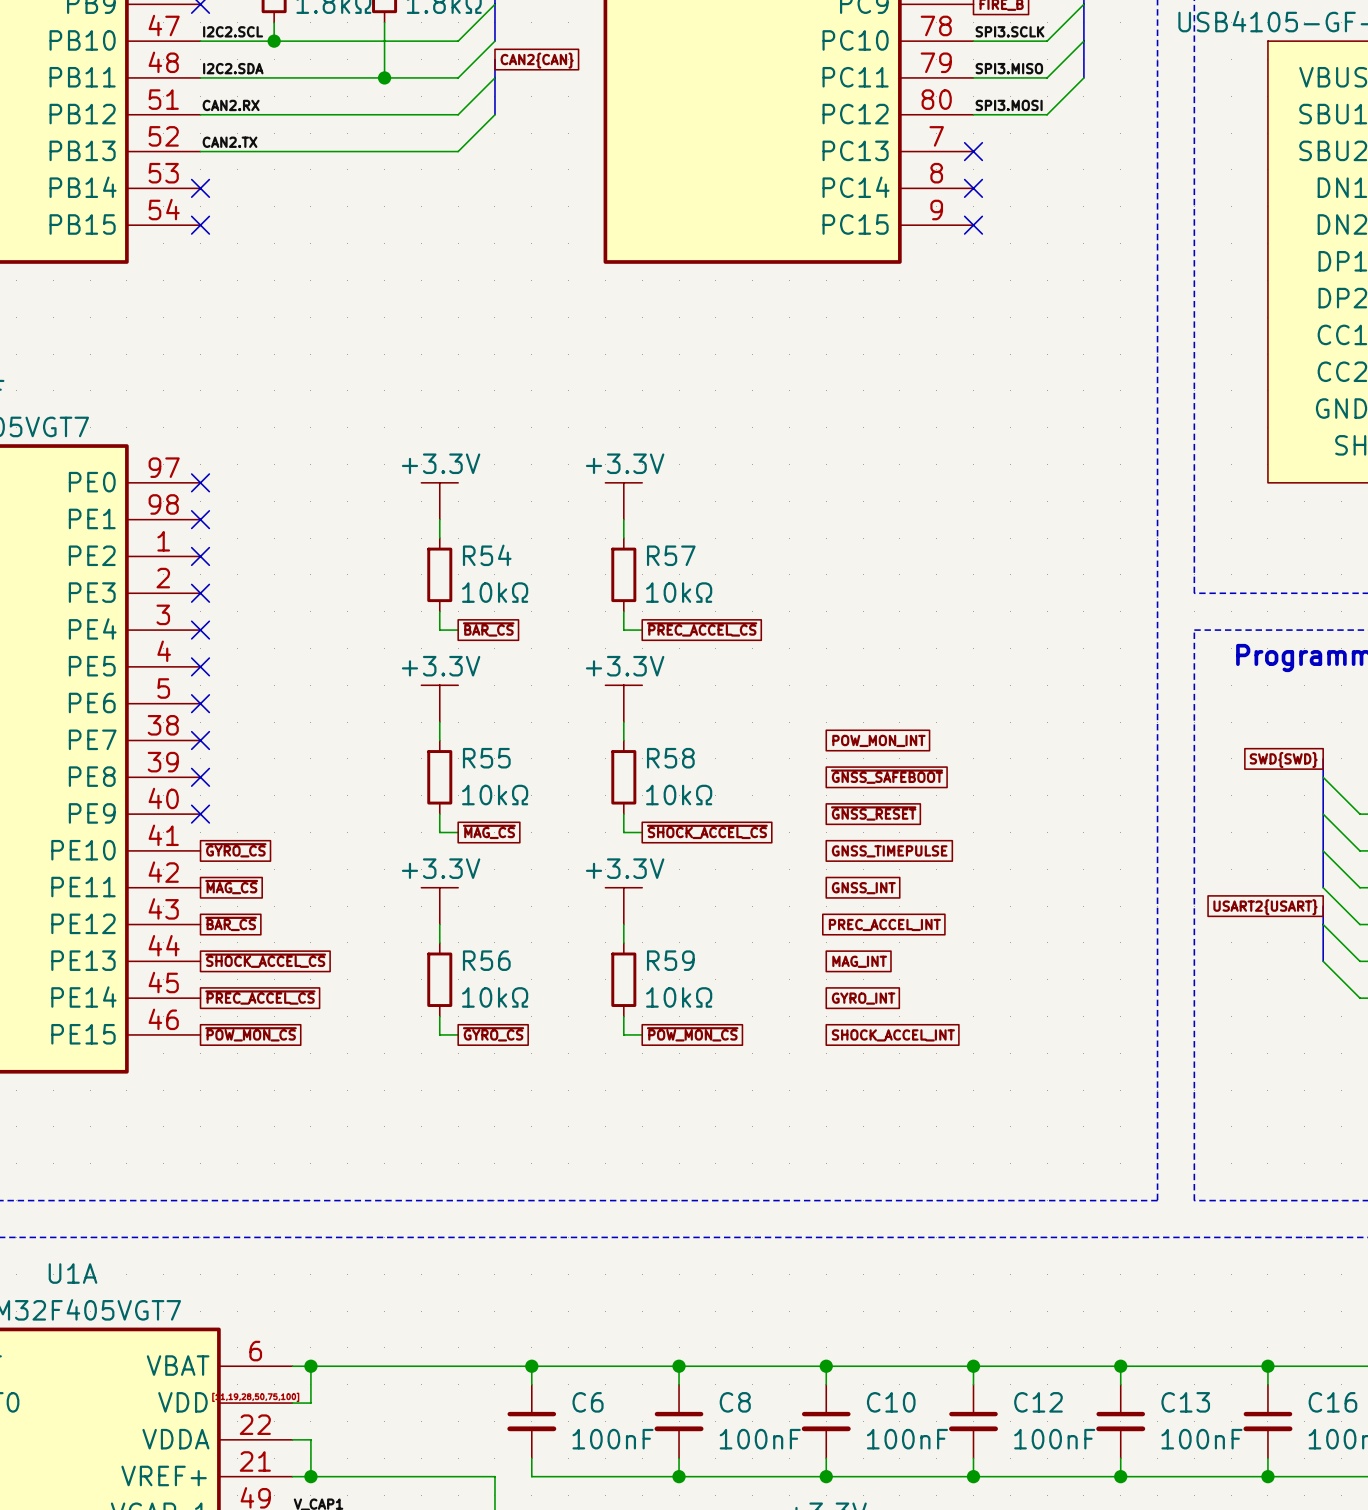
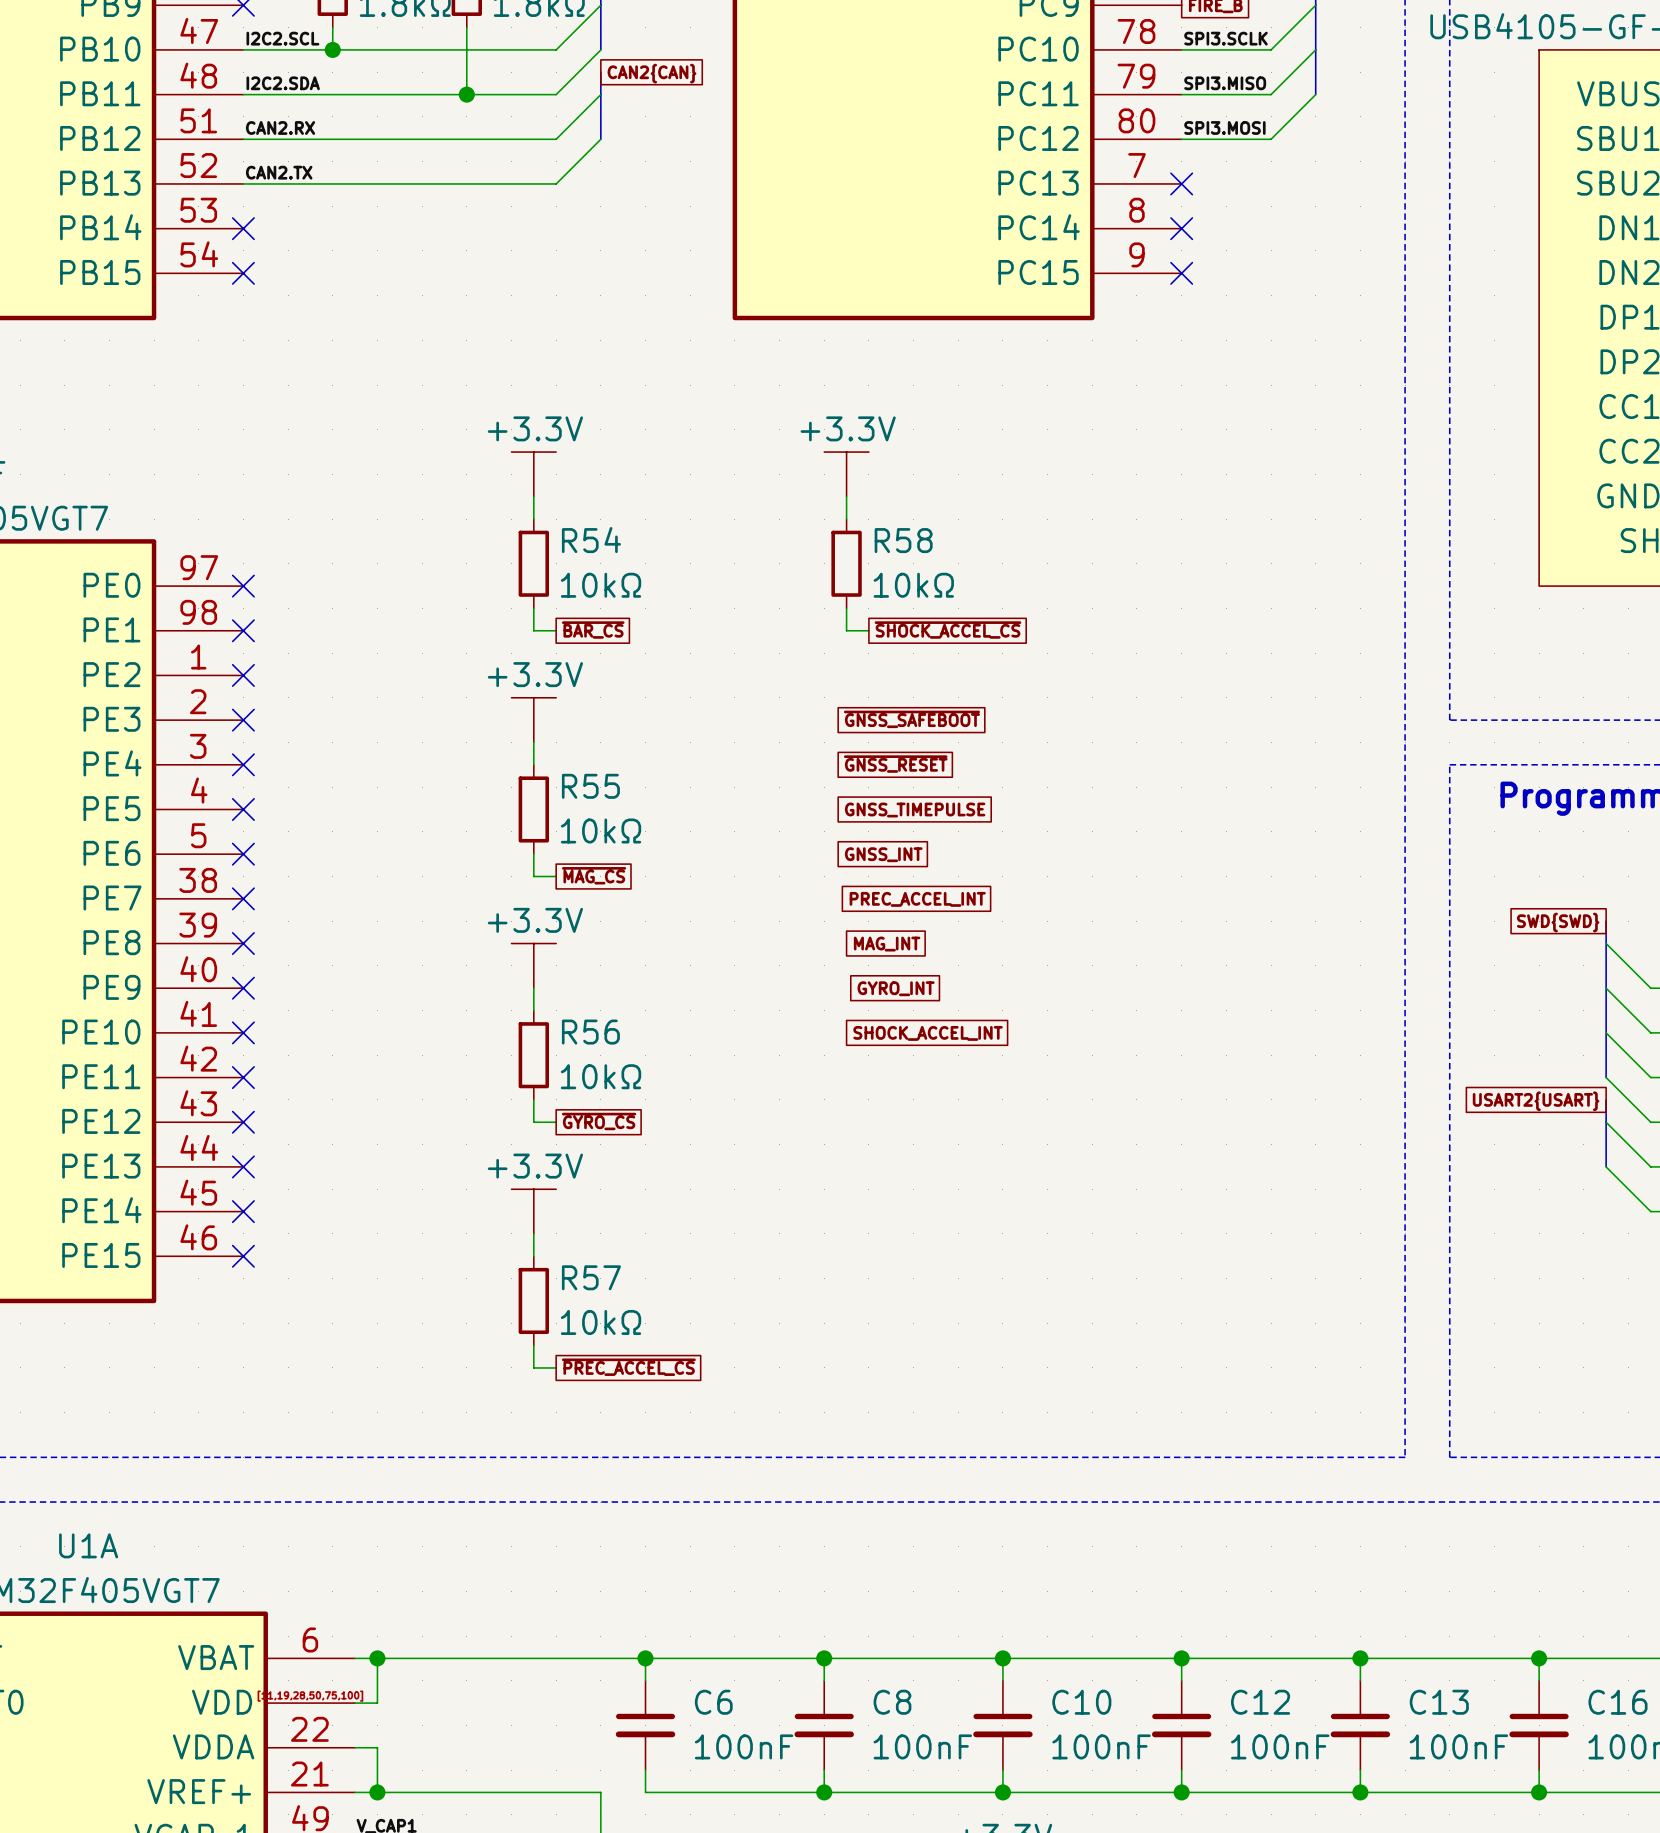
power symbol: none -> +3.3V (533, 474)
power symbol: none -> +3.3V (846, 474)
power symbol: +3.3V (439, 501) -> none
power symbol: +3.3V (623, 501) -> none
wire: none -> (846, 608) (846, 630) (868, 630)
wire: (439, 519) (439, 538) -> none
wire: (623, 519) (623, 538) -> (533, 496) (533, 519)
R54 position: (439, 574) -> (533, 563)
R57 position: (623, 574) -> (533, 1300)
power symbol: none -> +3.3V (533, 720)
wire: (623, 611) (623, 630) (642, 630) -> (533, 608) (533, 630) (556, 630)
global label position: ~{BAR_CS} (488, 629) -> ~{BAR_CS} (593, 630)
global label: ~{PREC_ACCEL_CS} (702, 629) -> none
wire: (439, 630) (458, 630) -> none
power symbol: +3.3V (439, 703) -> none
power symbol: +3.3V (623, 703) -> none
wire: (439, 722) (439, 740) -> none
wire: (623, 722) (623, 740) -> (846, 496) (846, 519)
global label: POW_MON_INT (878, 740) -> none
global label position: ~{GNSS_SAFEBOOT} (887, 776) -> ~{GNSS_SAFEBOOT} (911, 719)
R55 position: (439, 777) -> (533, 809)
R58 position: (623, 777) -> (846, 563)
power symbol: none -> +3.3V (533, 965)
global label position: ~{GNSS_RESET} (873, 813) -> ~{GNSS_RESET} (895, 764)
wire: (623, 814) (623, 832) (642, 832) -> (533, 854) (533, 876) (556, 876)
global label position: ~{MAG_CS} (489, 831) -> ~{MAG_CS} (594, 875)
global label position: ~{SHOCK_ACCEL_CS} (707, 831) -> ~{SHOCK_ACCEL_CS} (948, 630)
wire: (439, 832) (458, 832) -> none
no-connect mark: none -> (243, 1032)
global label: ~{GYRO_CS} (235, 850) -> none
global label position: GNSS_TIMEPULSE (889, 851) -> GNSS_TIMEPULSE (915, 810)
no-connect mark: none -> (243, 1077)
global label: ~{MAG_CS} (231, 887) -> none
global label position: GNSS_INT (863, 888) -> GNSS_INT (883, 854)
power symbol: +3.3V (439, 906) -> none
power symbol: +3.3V (623, 906) -> none
global label: ~{BAR_CS} (231, 923) -> none
no-connect mark: none -> (243, 1122)
wire: (439, 924) (439, 942) -> none
wire: (623, 924) (623, 942) -> none
global label position: PREC_ACCEL_INT (884, 924) -> PREC_ACCEL_INT (917, 899)
global label: ~{SHOCK_ACCEL_CS} (265, 960) -> none
no-connect mark: none -> (243, 1166)
global label position: MAG_INT (859, 961) -> MAG_INT (887, 944)
R56 position: (439, 979) -> (533, 1055)
R59: 10kΩ (623, 979) -> none
global label: ~{PREC_ACCEL_CS} (260, 997) -> none
no-connect mark: none -> (243, 1211)
power symbol: none -> +3.3V (533, 1211)
global label position: GYRO_INT (863, 998) -> GYRO_INT (896, 988)
wire: (623, 1016) (623, 1034) (642, 1034) -> (533, 1099) (533, 1122) (556, 1122)
no-connect mark: none -> (243, 1256)
global label: ~{POW_MON_CS} (250, 1034) -> none
wire: (439, 1034) (458, 1034) -> none
global label position: ~{GYRO_CS} (493, 1034) -> ~{GYRO_CS} (599, 1121)
global label: ~{POW_MON_CS} (692, 1034) -> none
global label position: SHOCK_ACCEL_INT (893, 1035) -> SHOCK_ACCEL_INT (928, 1033)
wire: none -> (533, 1345) (533, 1367) (556, 1367)
global label: none -> ~{PREC_ACCEL_CS} (628, 1367)

